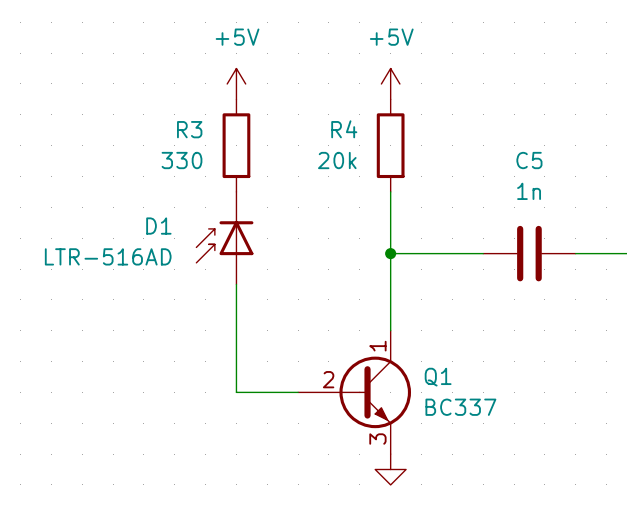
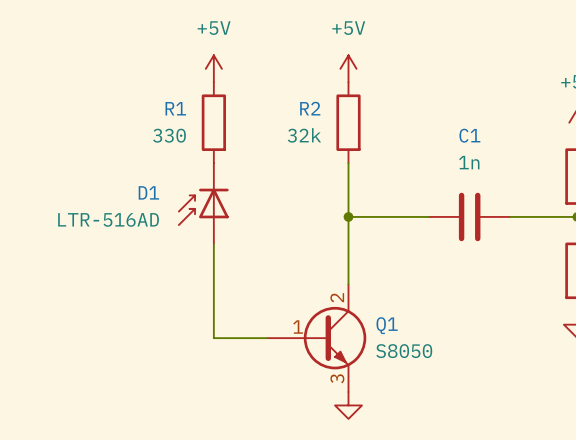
R3 name: R3 (189, 129) -> R1 (175, 108)
R4 name: R4 (344, 129) -> R2 (310, 108)
R4 value: 20k (337, 160) -> 32k (304, 135)
C5 name: C5 (529, 160) -> C1 (469, 135)
Q1 symbol: [298, 330, 412, 455] -> [267, 284, 367, 392]
Q1 value: BC337 (460, 407) -> S8050 (404, 351)

